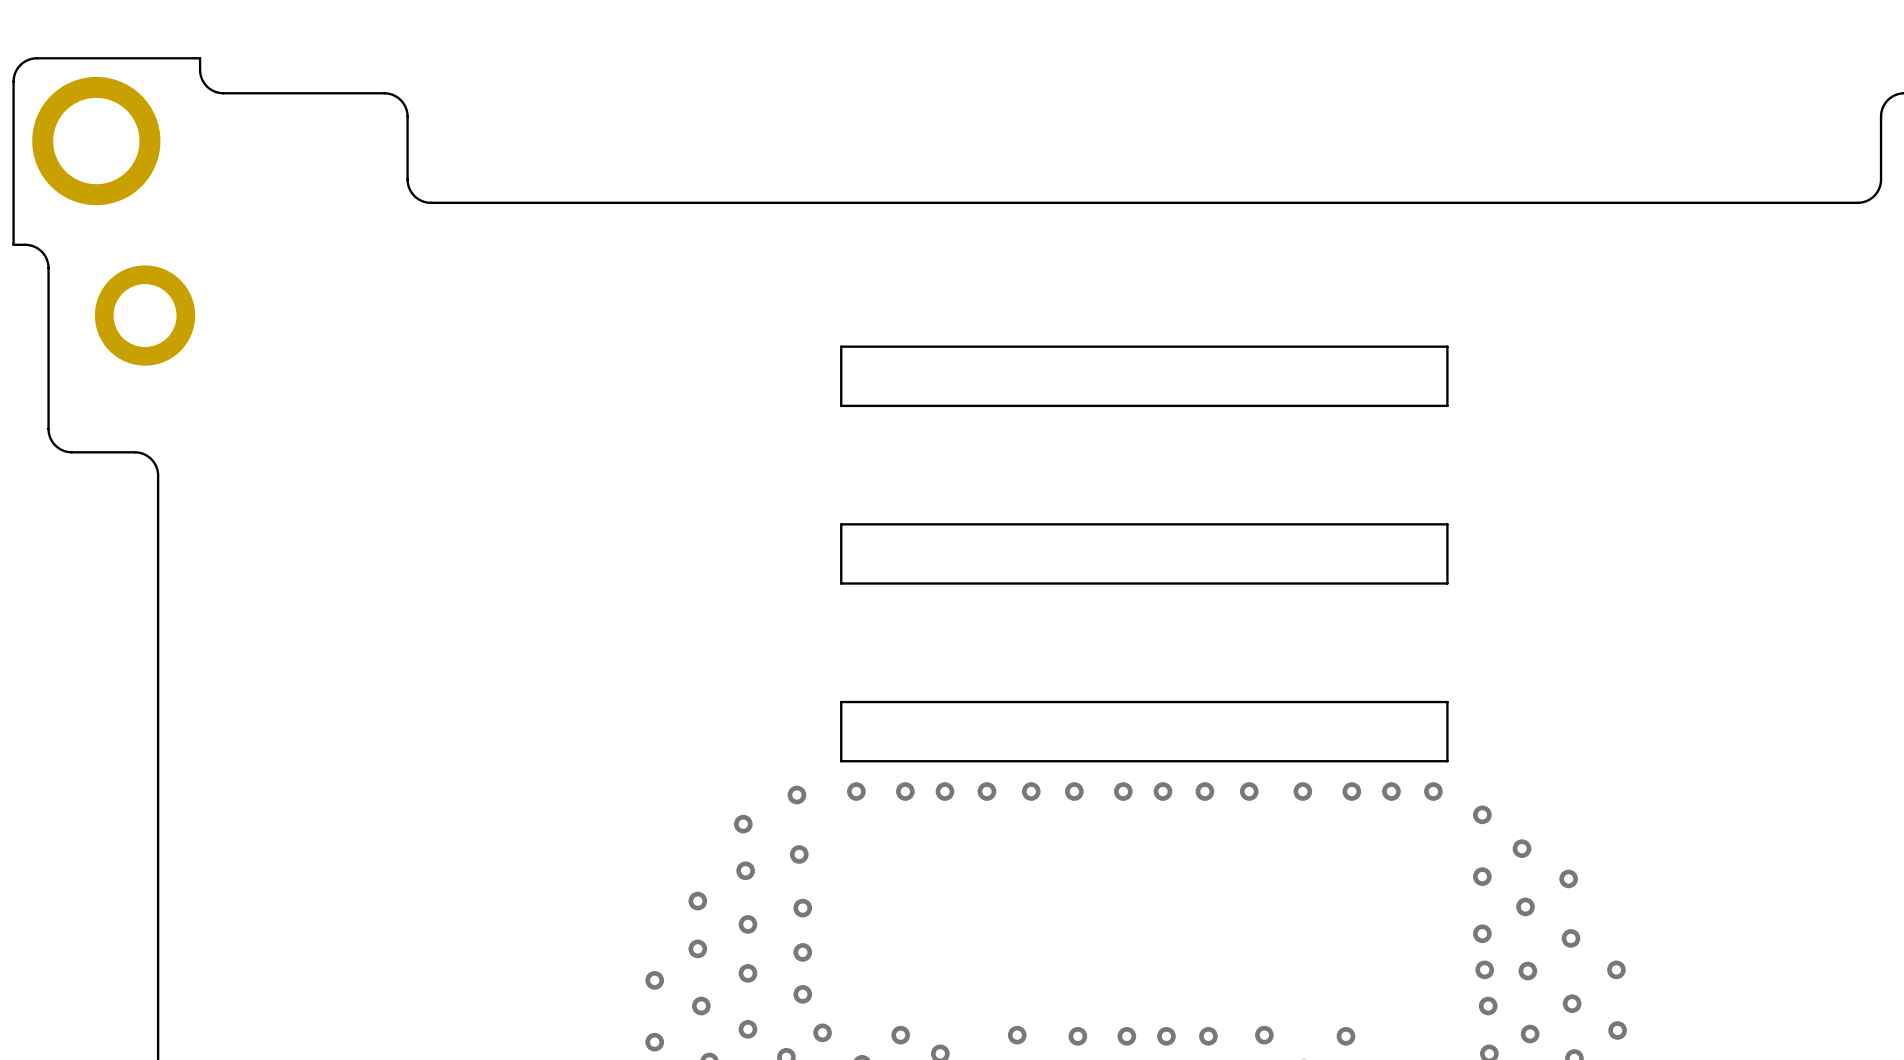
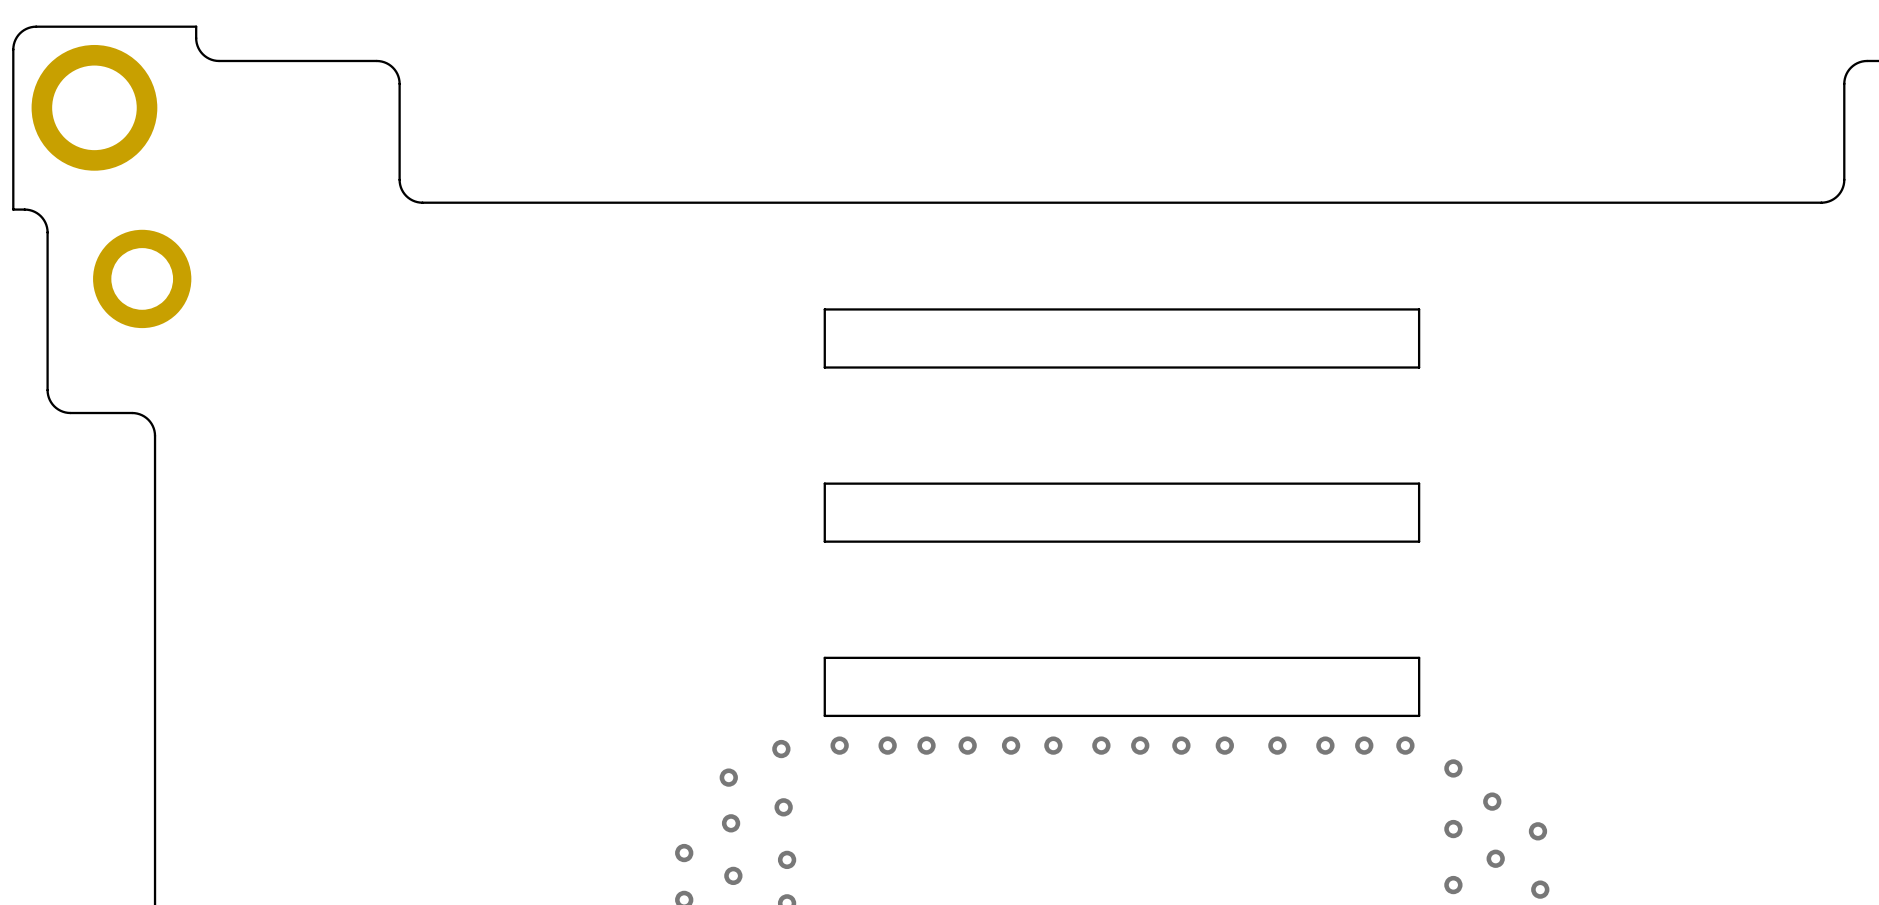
board edge: (407, 179) (409, 189) (414, 196) (420, 200) (430, 202) (1857, 202) (1867, 200) (1874, 196) (1879, 187) (1881, 179) -> (399, 145) (400, 187) (408, 197) (422, 202) (1821, 202) (1835, 197) (1843, 187) (1844, 145)

